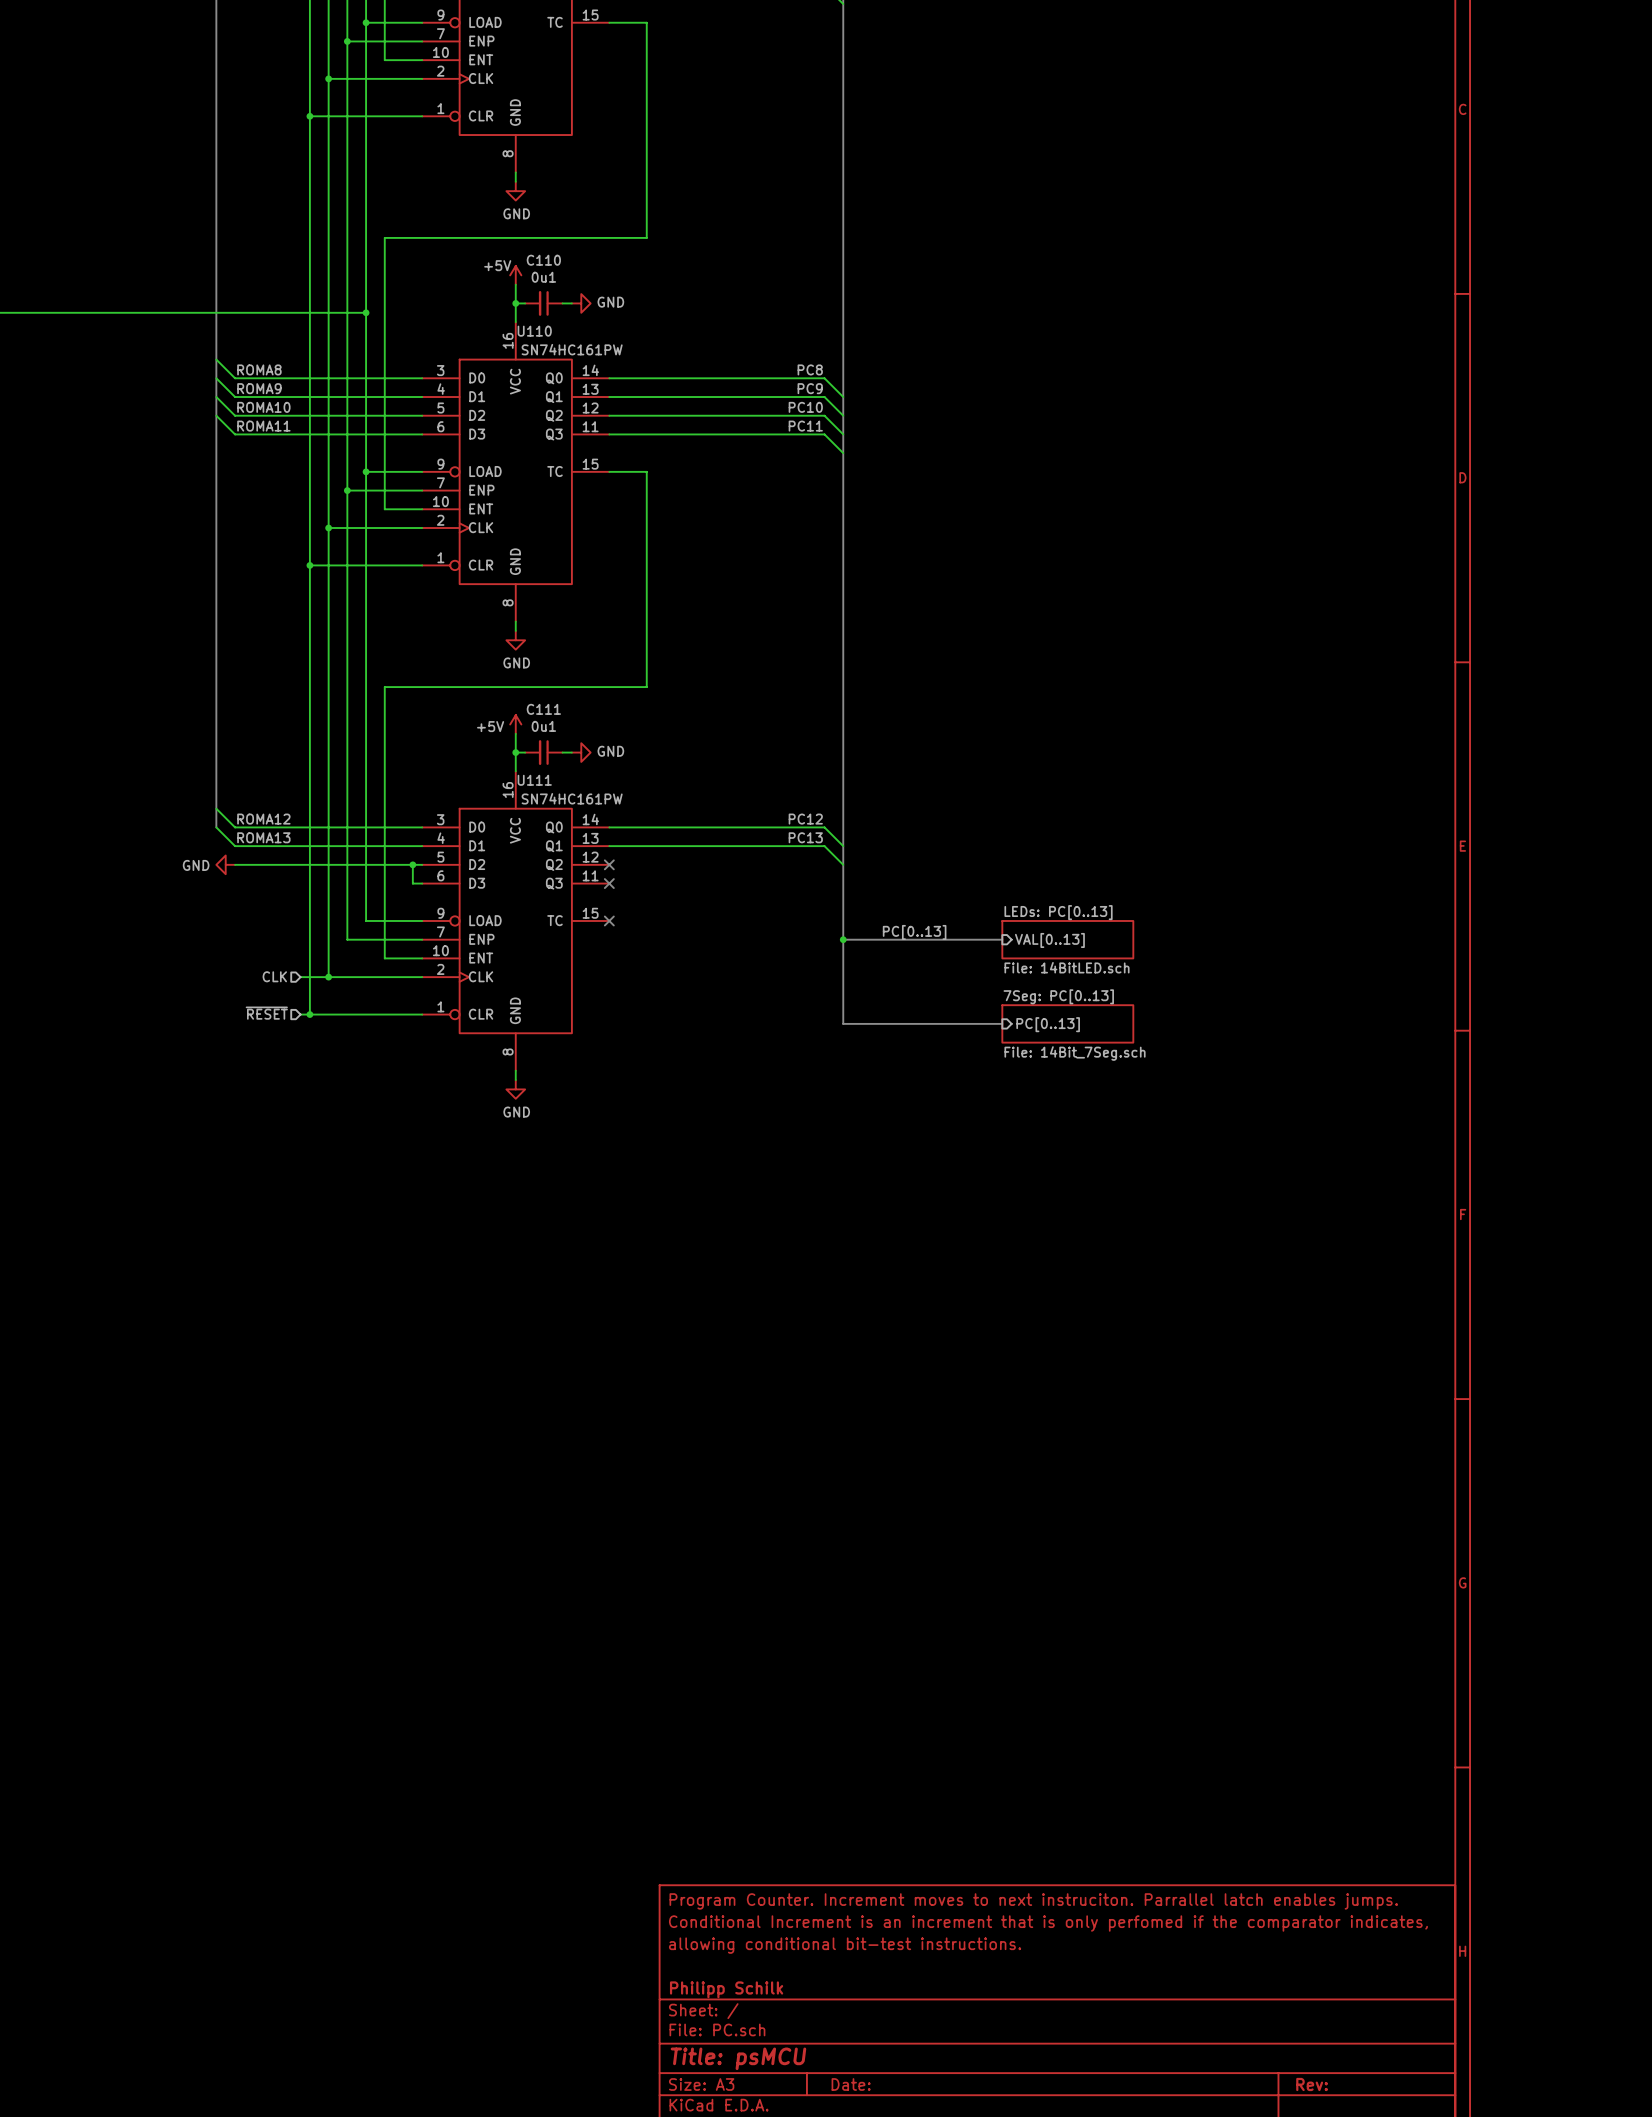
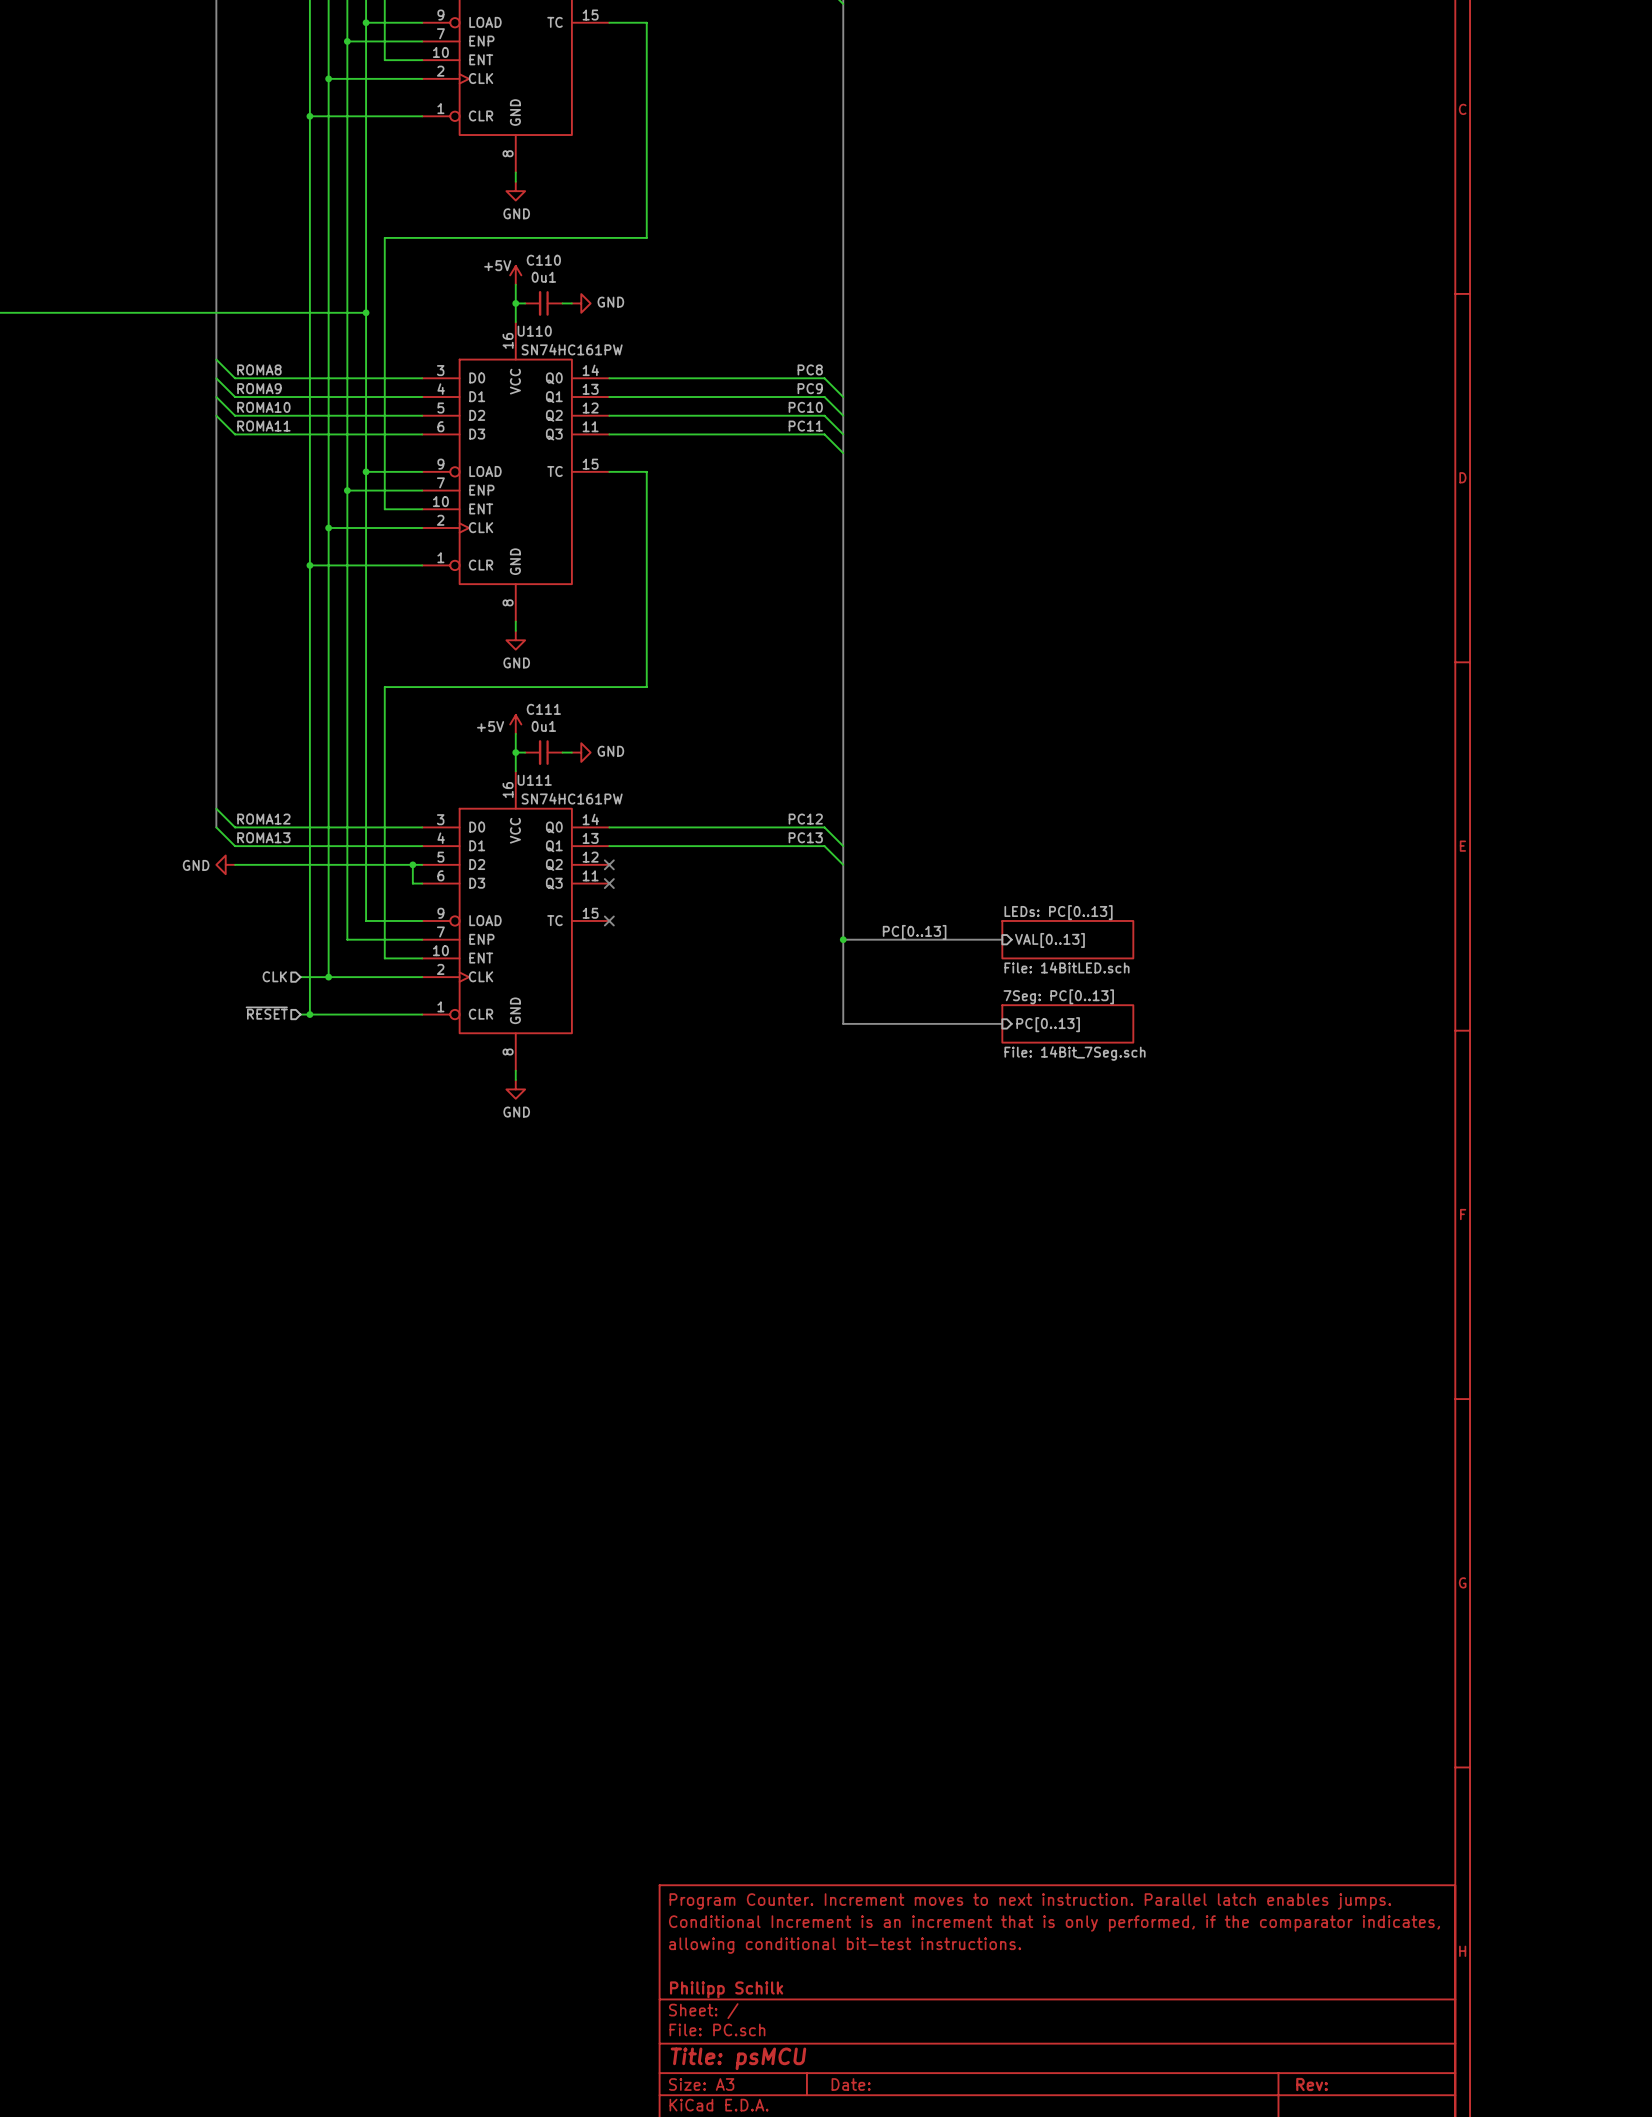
title block: Program Counter. Increment moves to next instruciton. Parrallel latch enables jumps. (1033, 1901) -> Program Counter. Increment moves to next instruction. Parallel latch enables jumps. (1030, 1901)
title block: Conditional Increment is an increment that is only perfomed if the comparator indicates, (1048, 1923) -> Conditional Increment is an increment that is only performed, if the comparator indicates, (1054, 1923)

